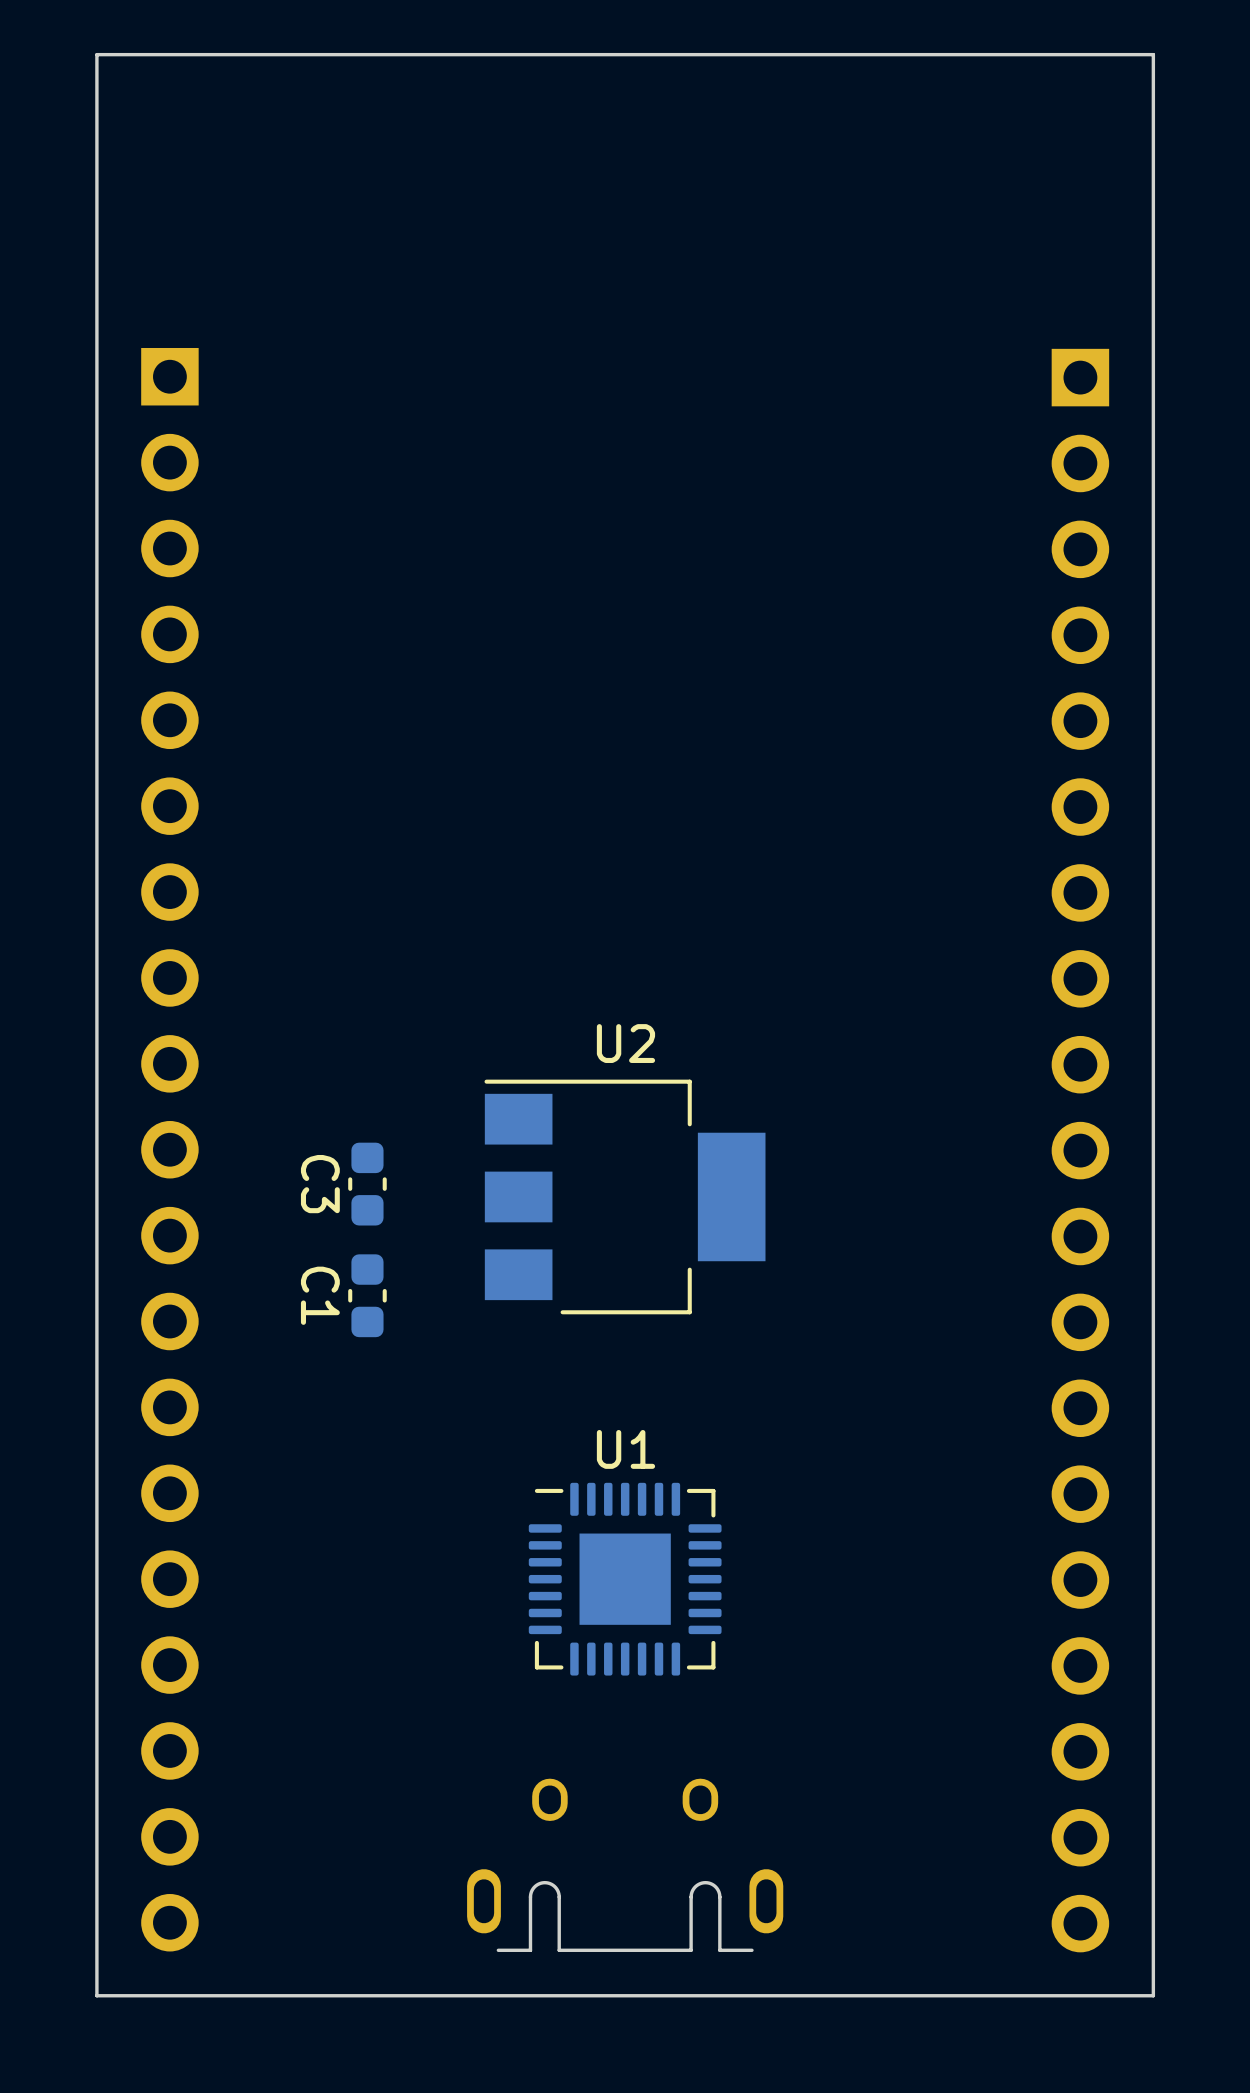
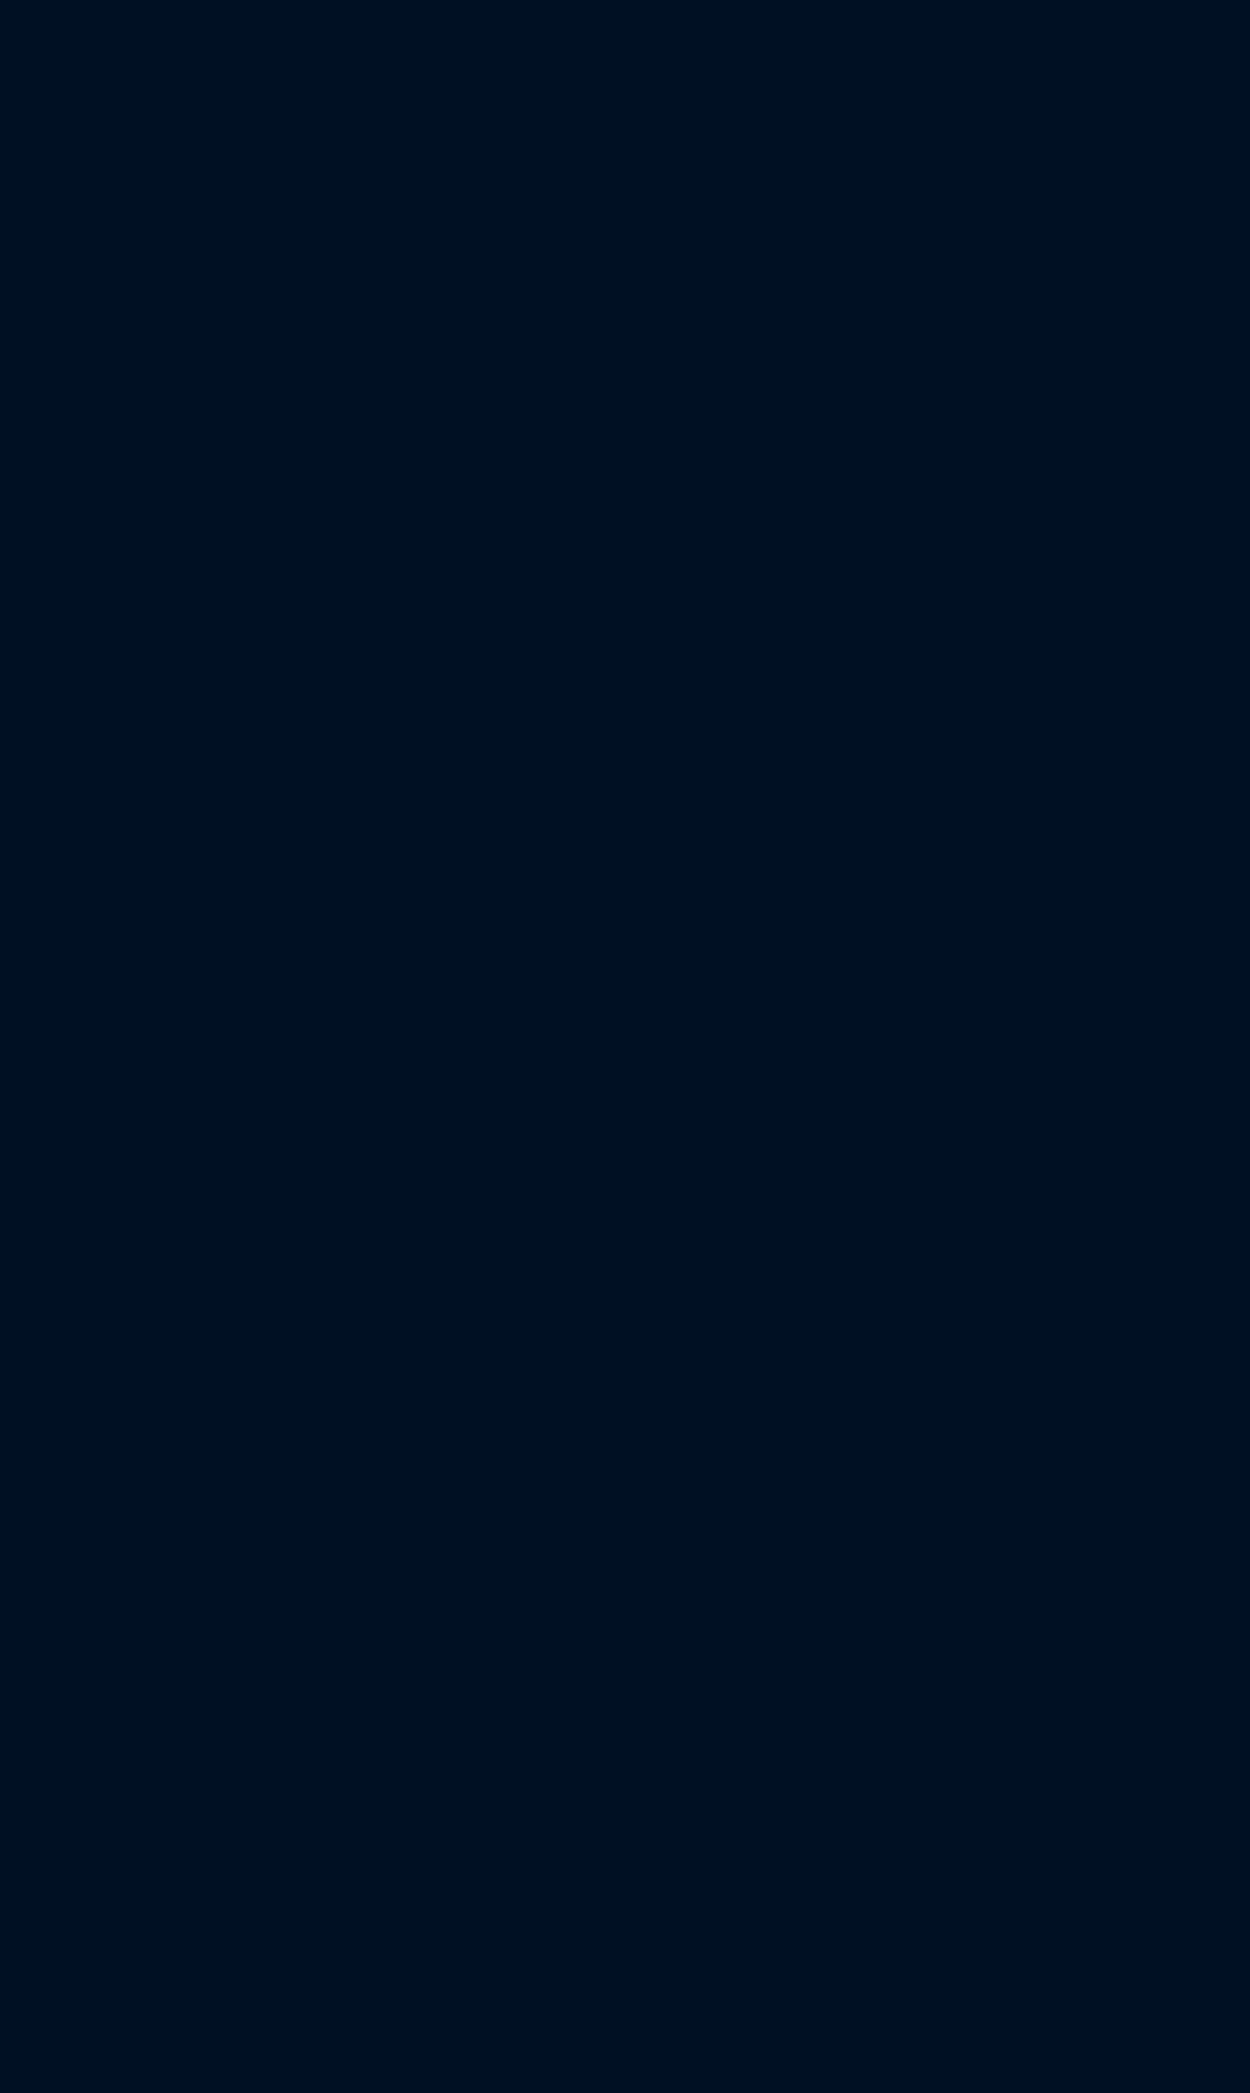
board edge: (1153, 54) (96, 54) (96, 1995) (1153, 1995) (1153, 54) -> none
part: (169, 1149) -> none
part: (1080, 1150) -> none
C3: (367, 1184) -> none
U2: (625, 1196) -> none
C1: (367, 1295) -> none
U1: (625, 1579) -> none
part: (625, 1865) -> none

